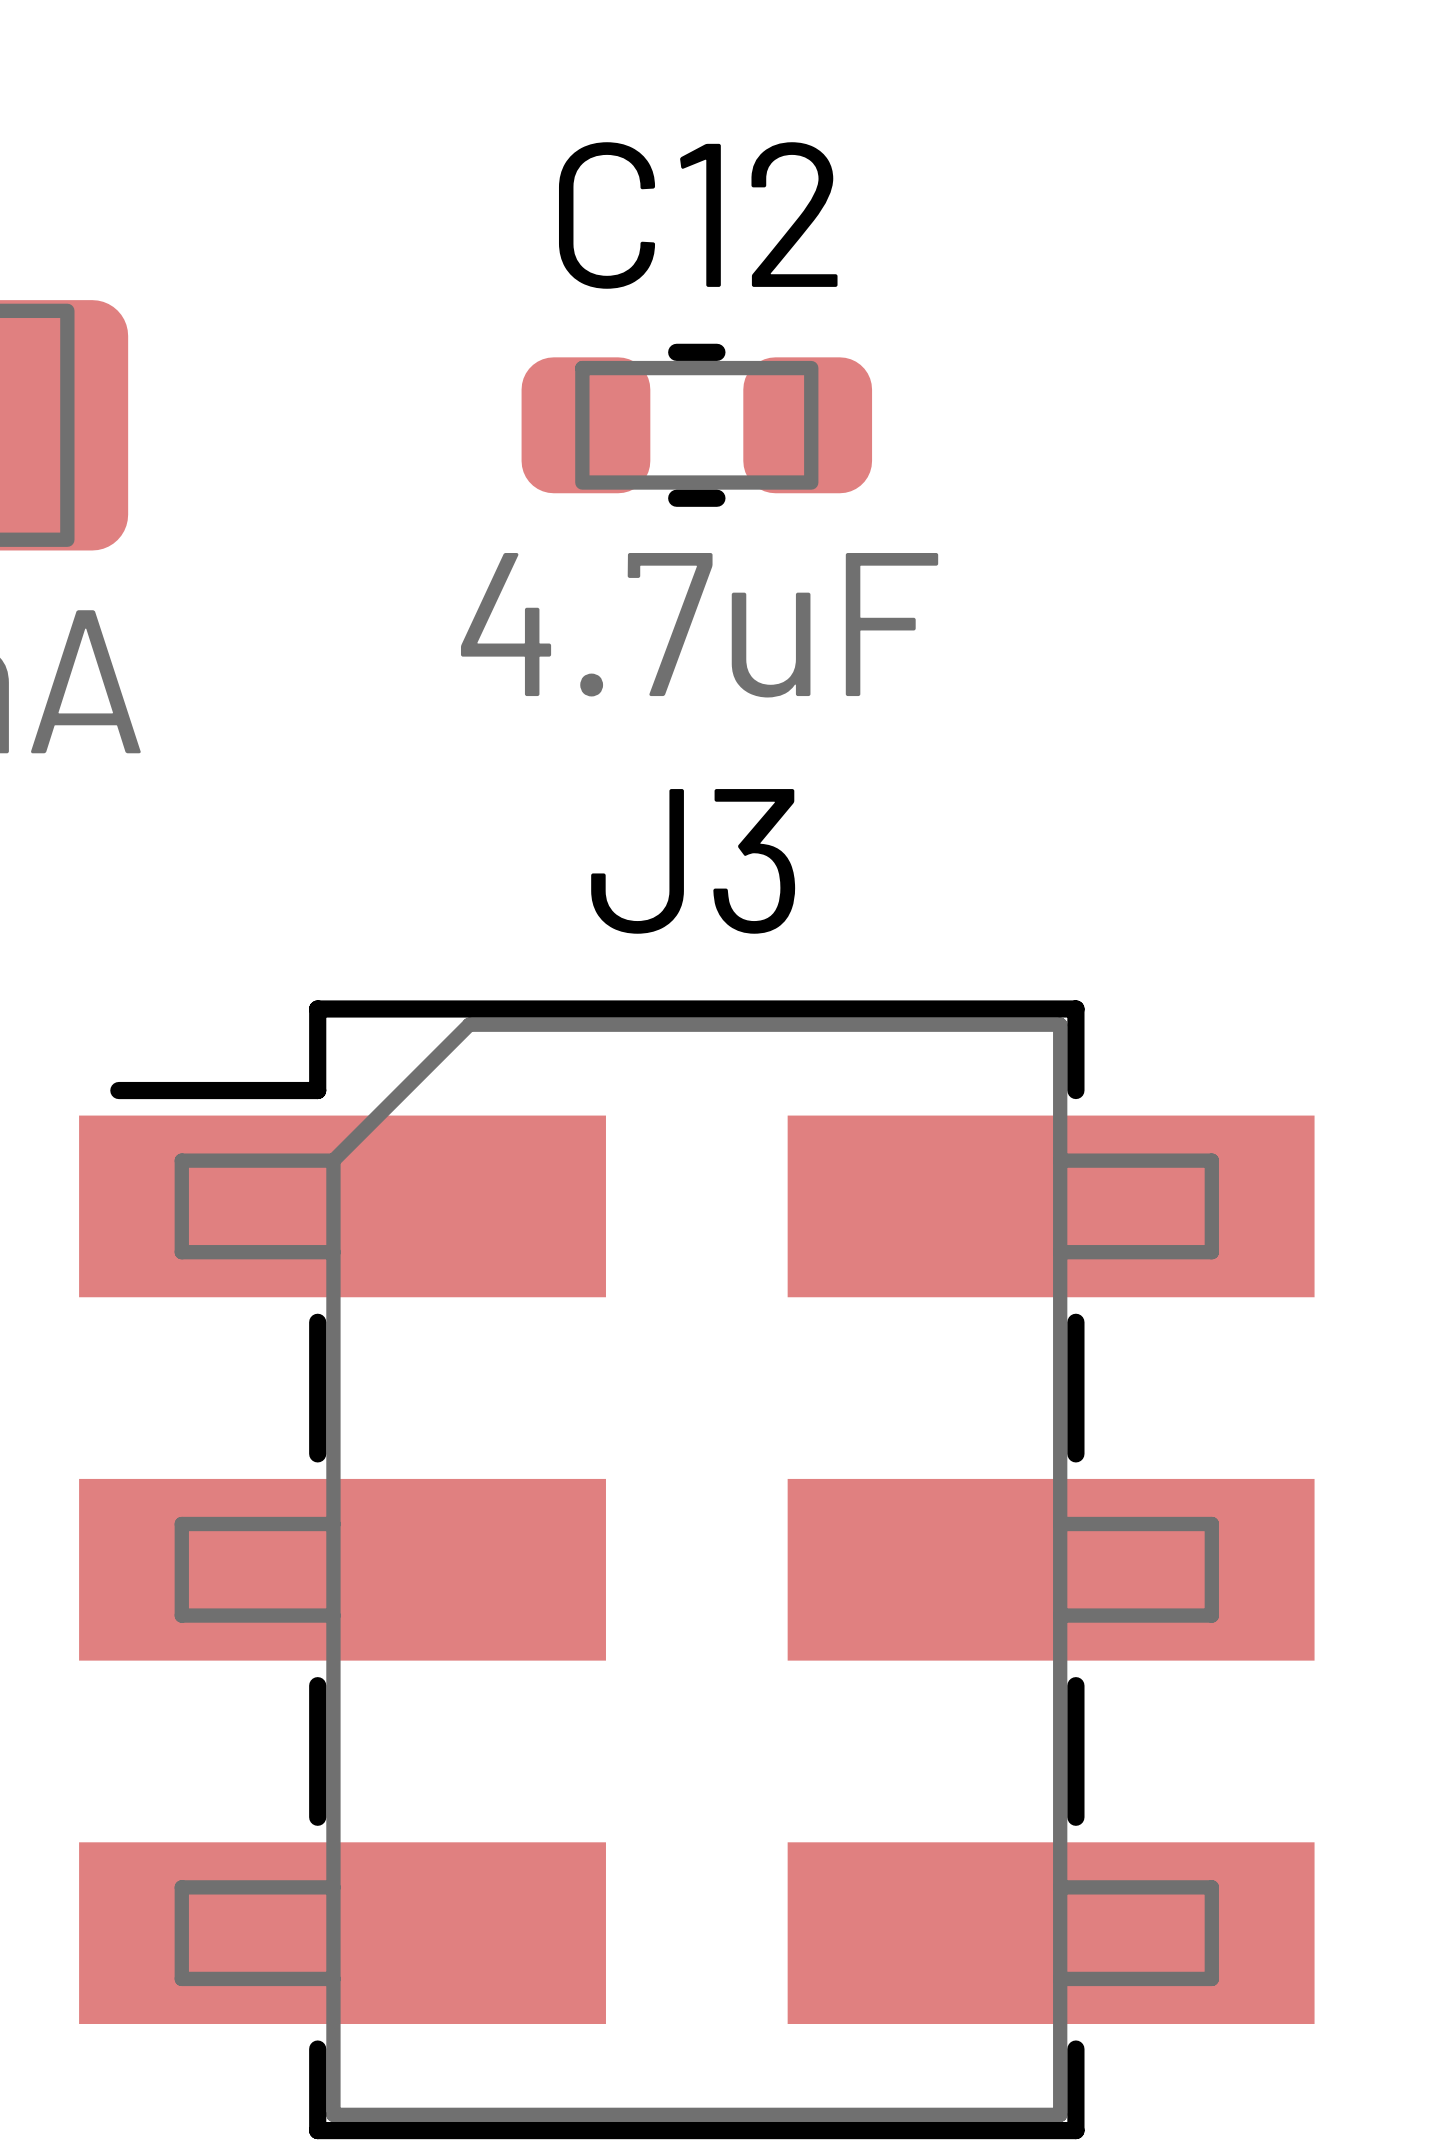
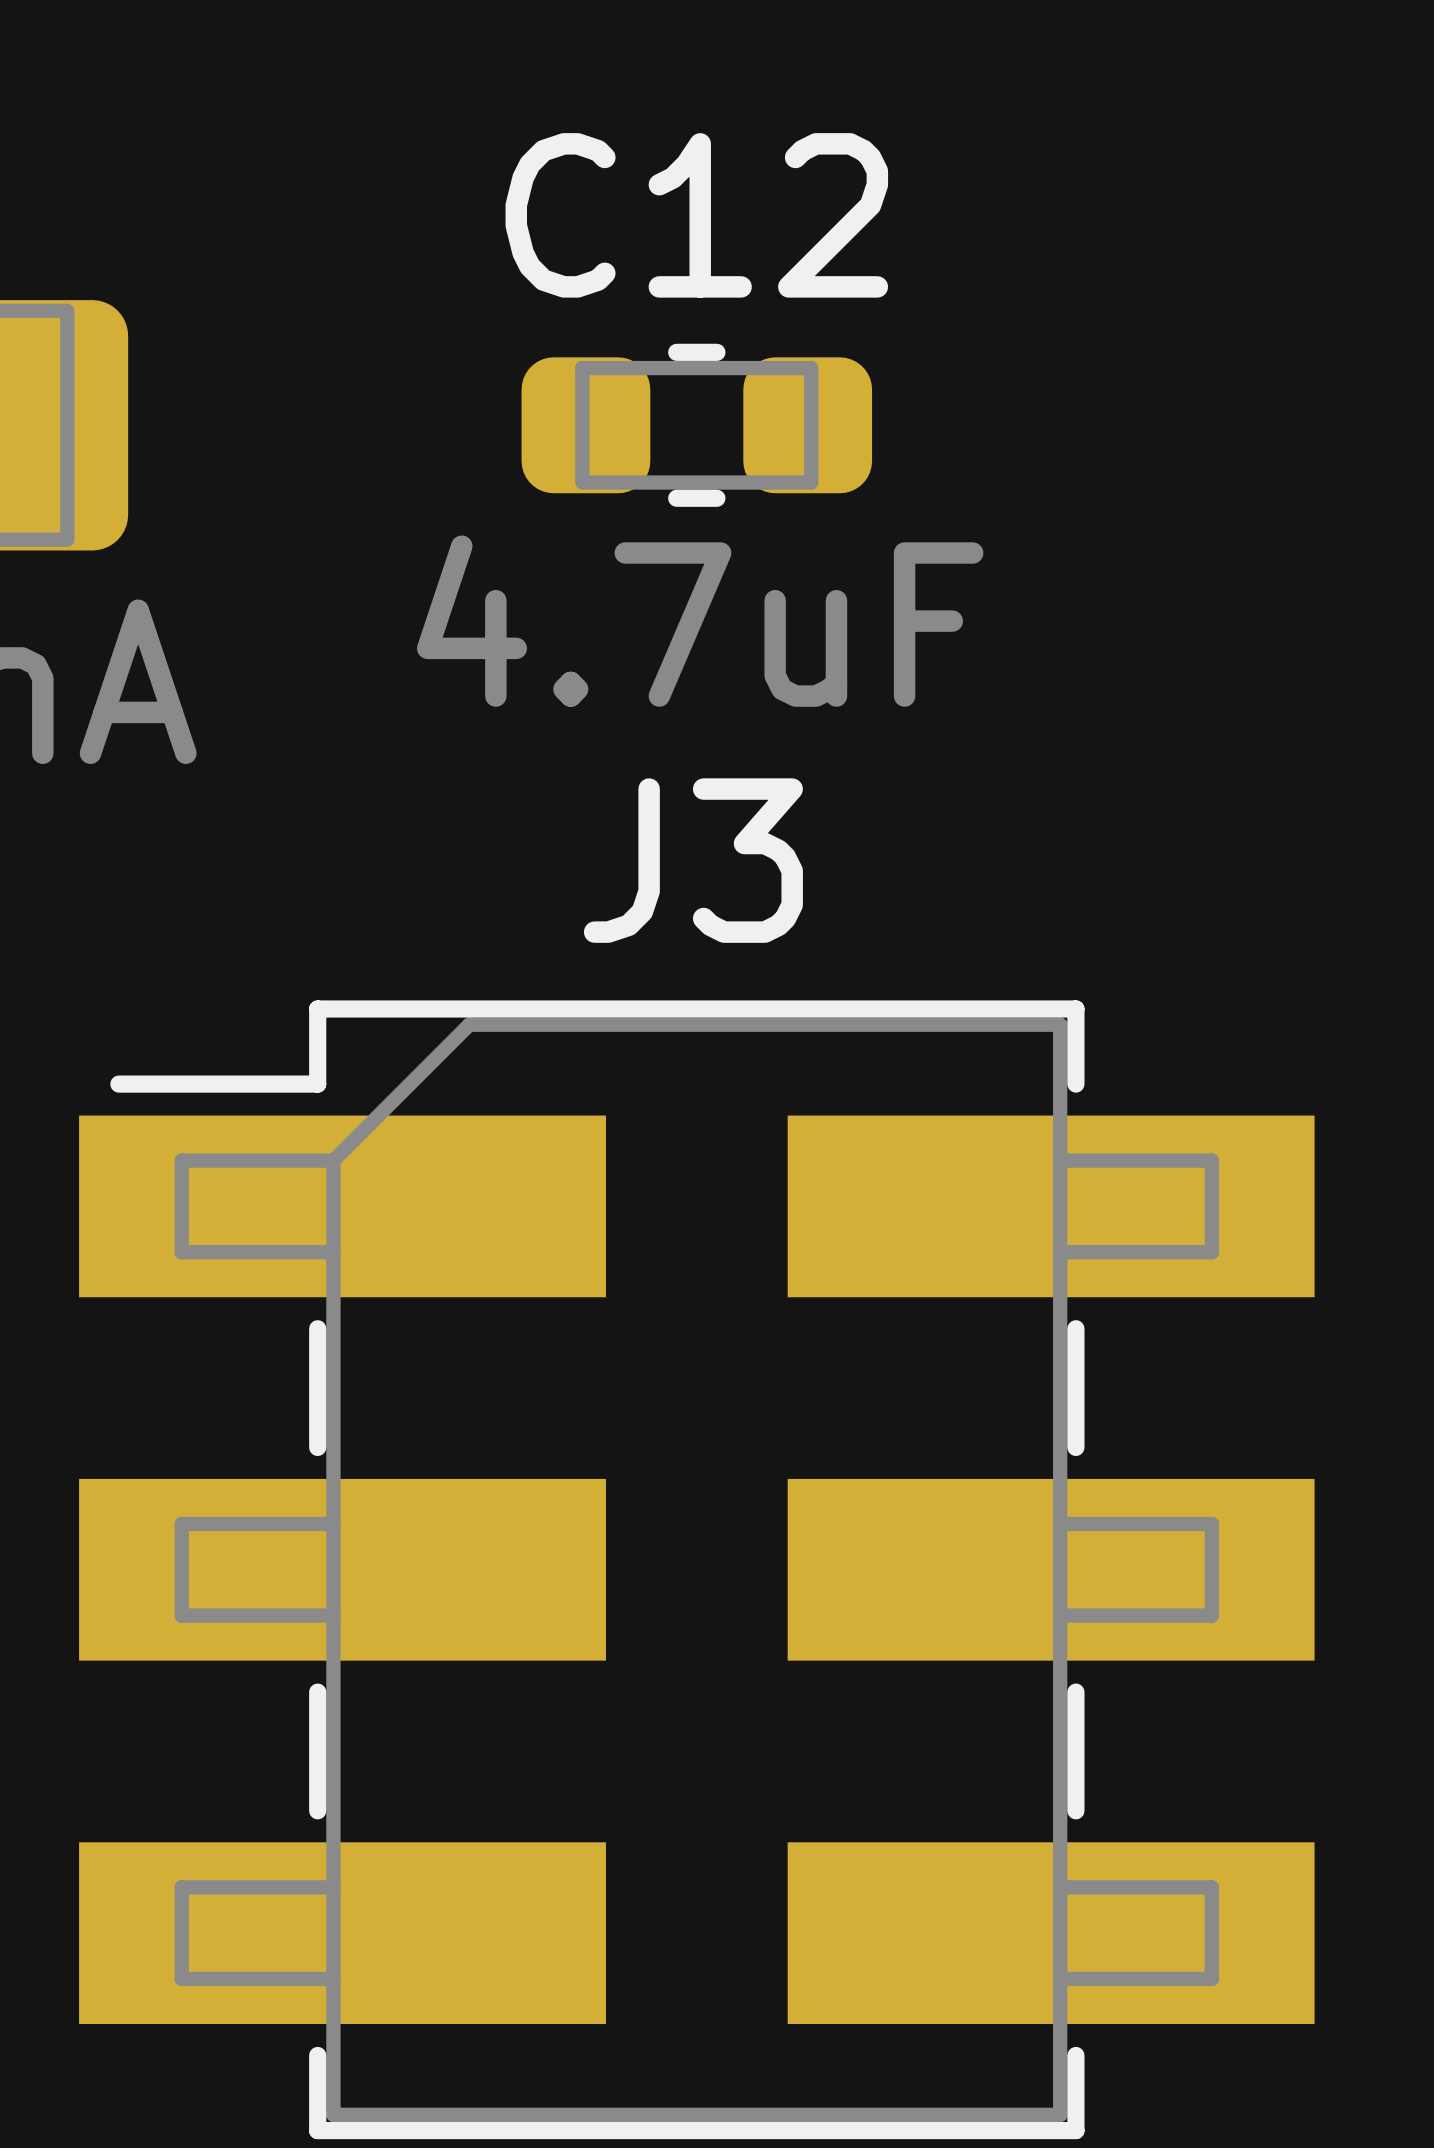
J3 footprint: [79, 1000, 1315, 2140] -> [79, 1000, 1315, 2140]

